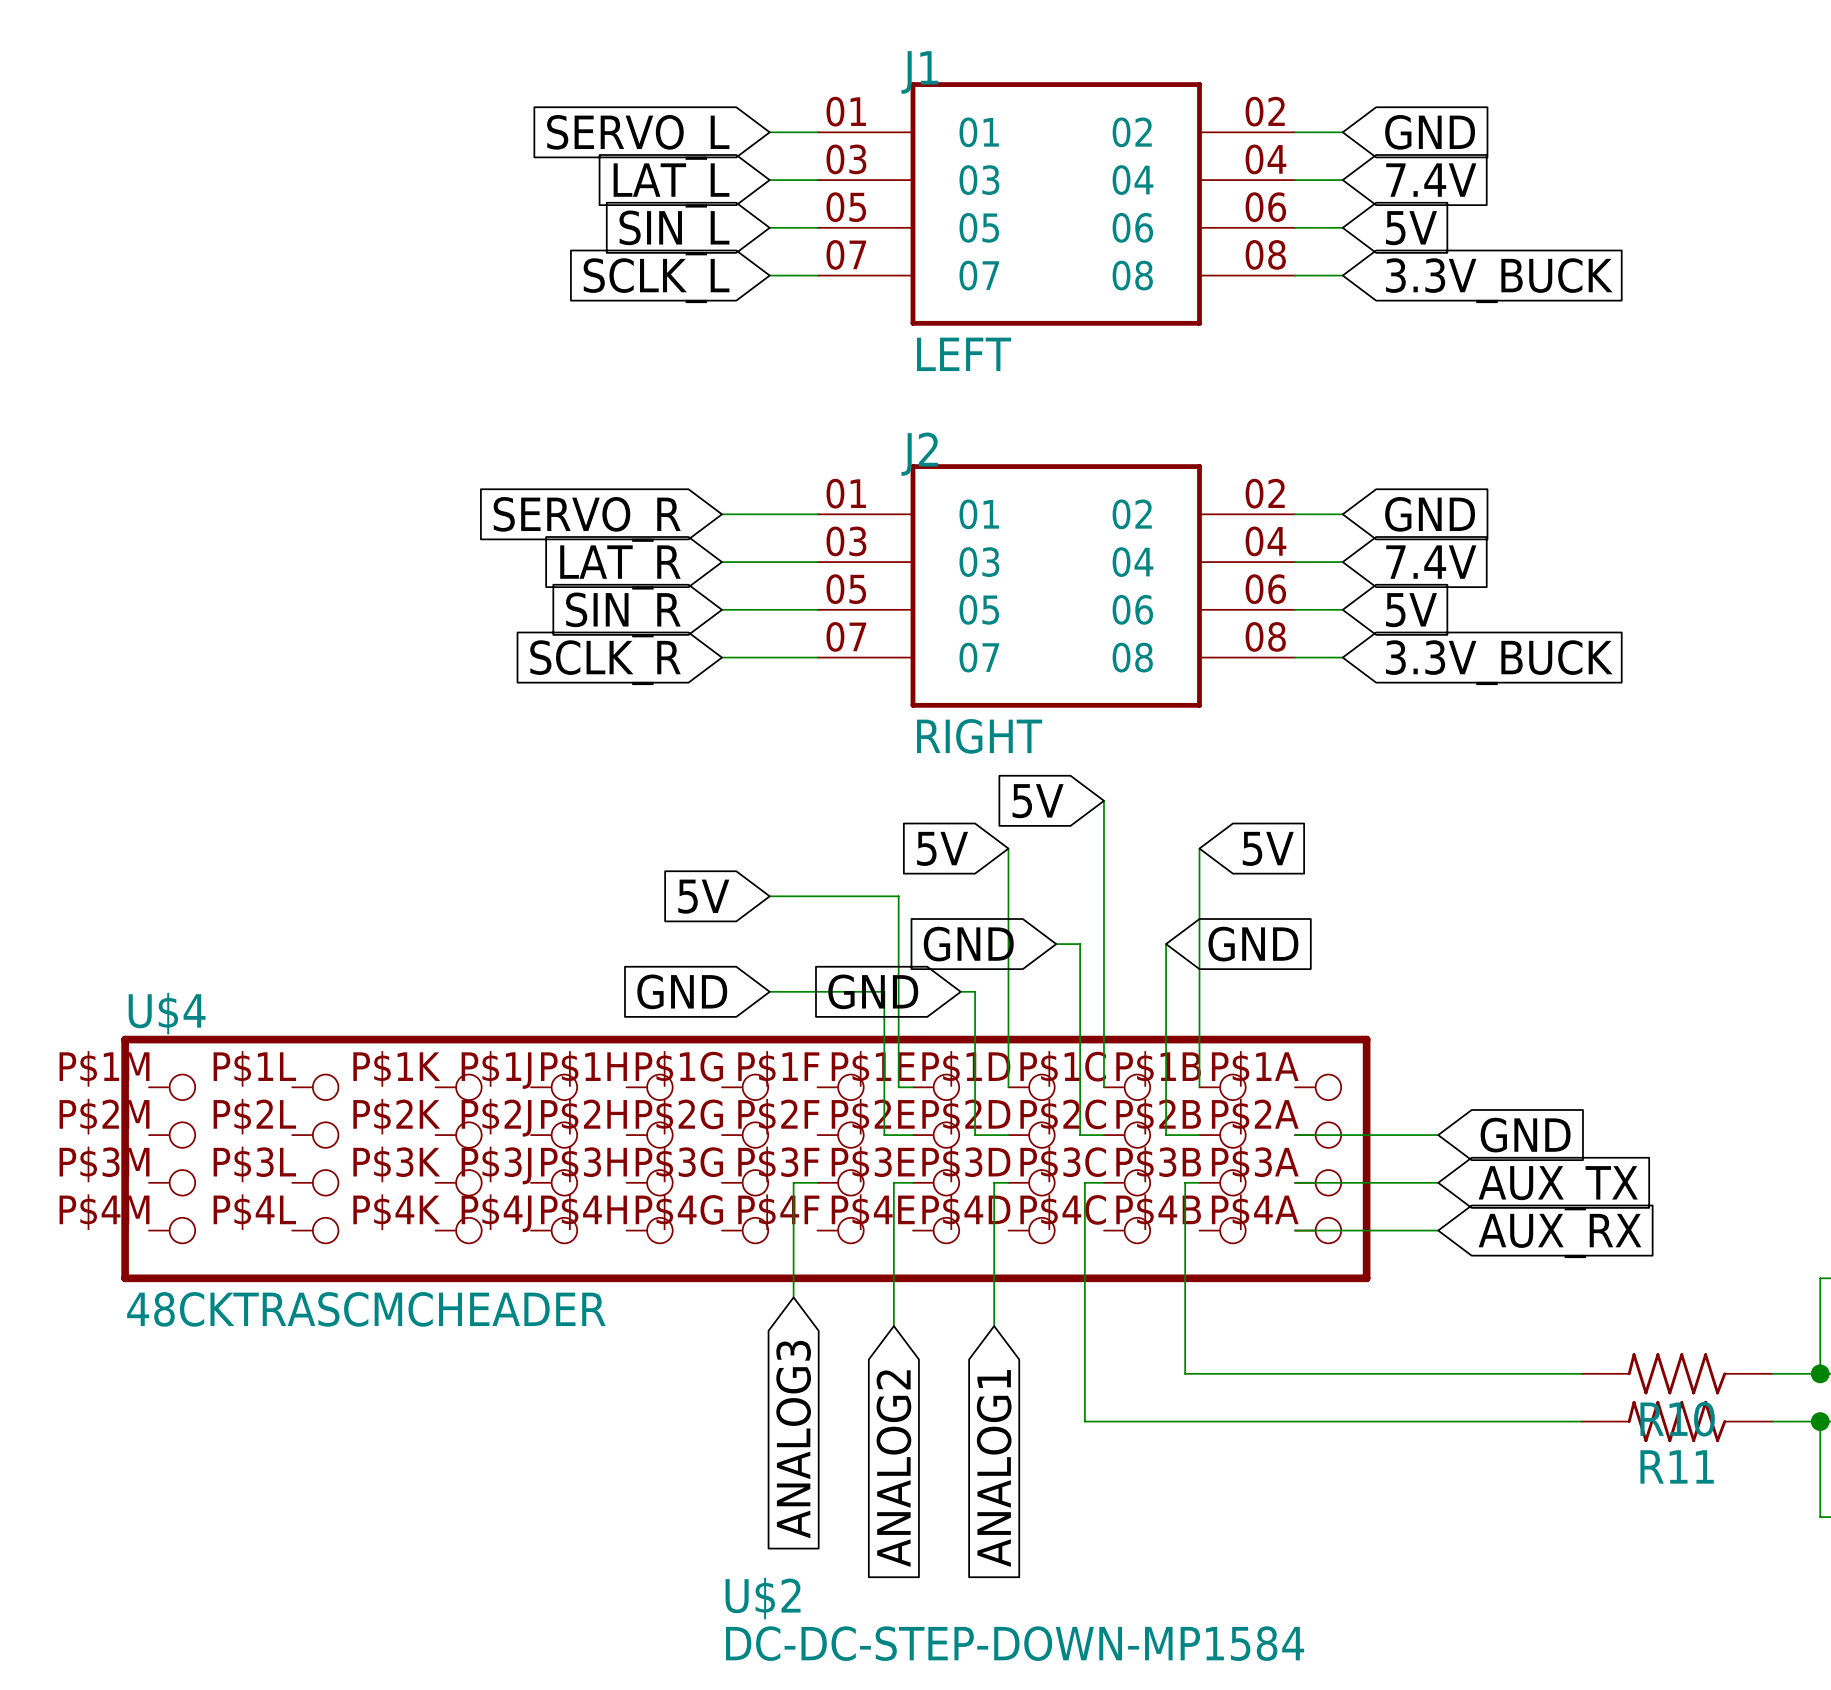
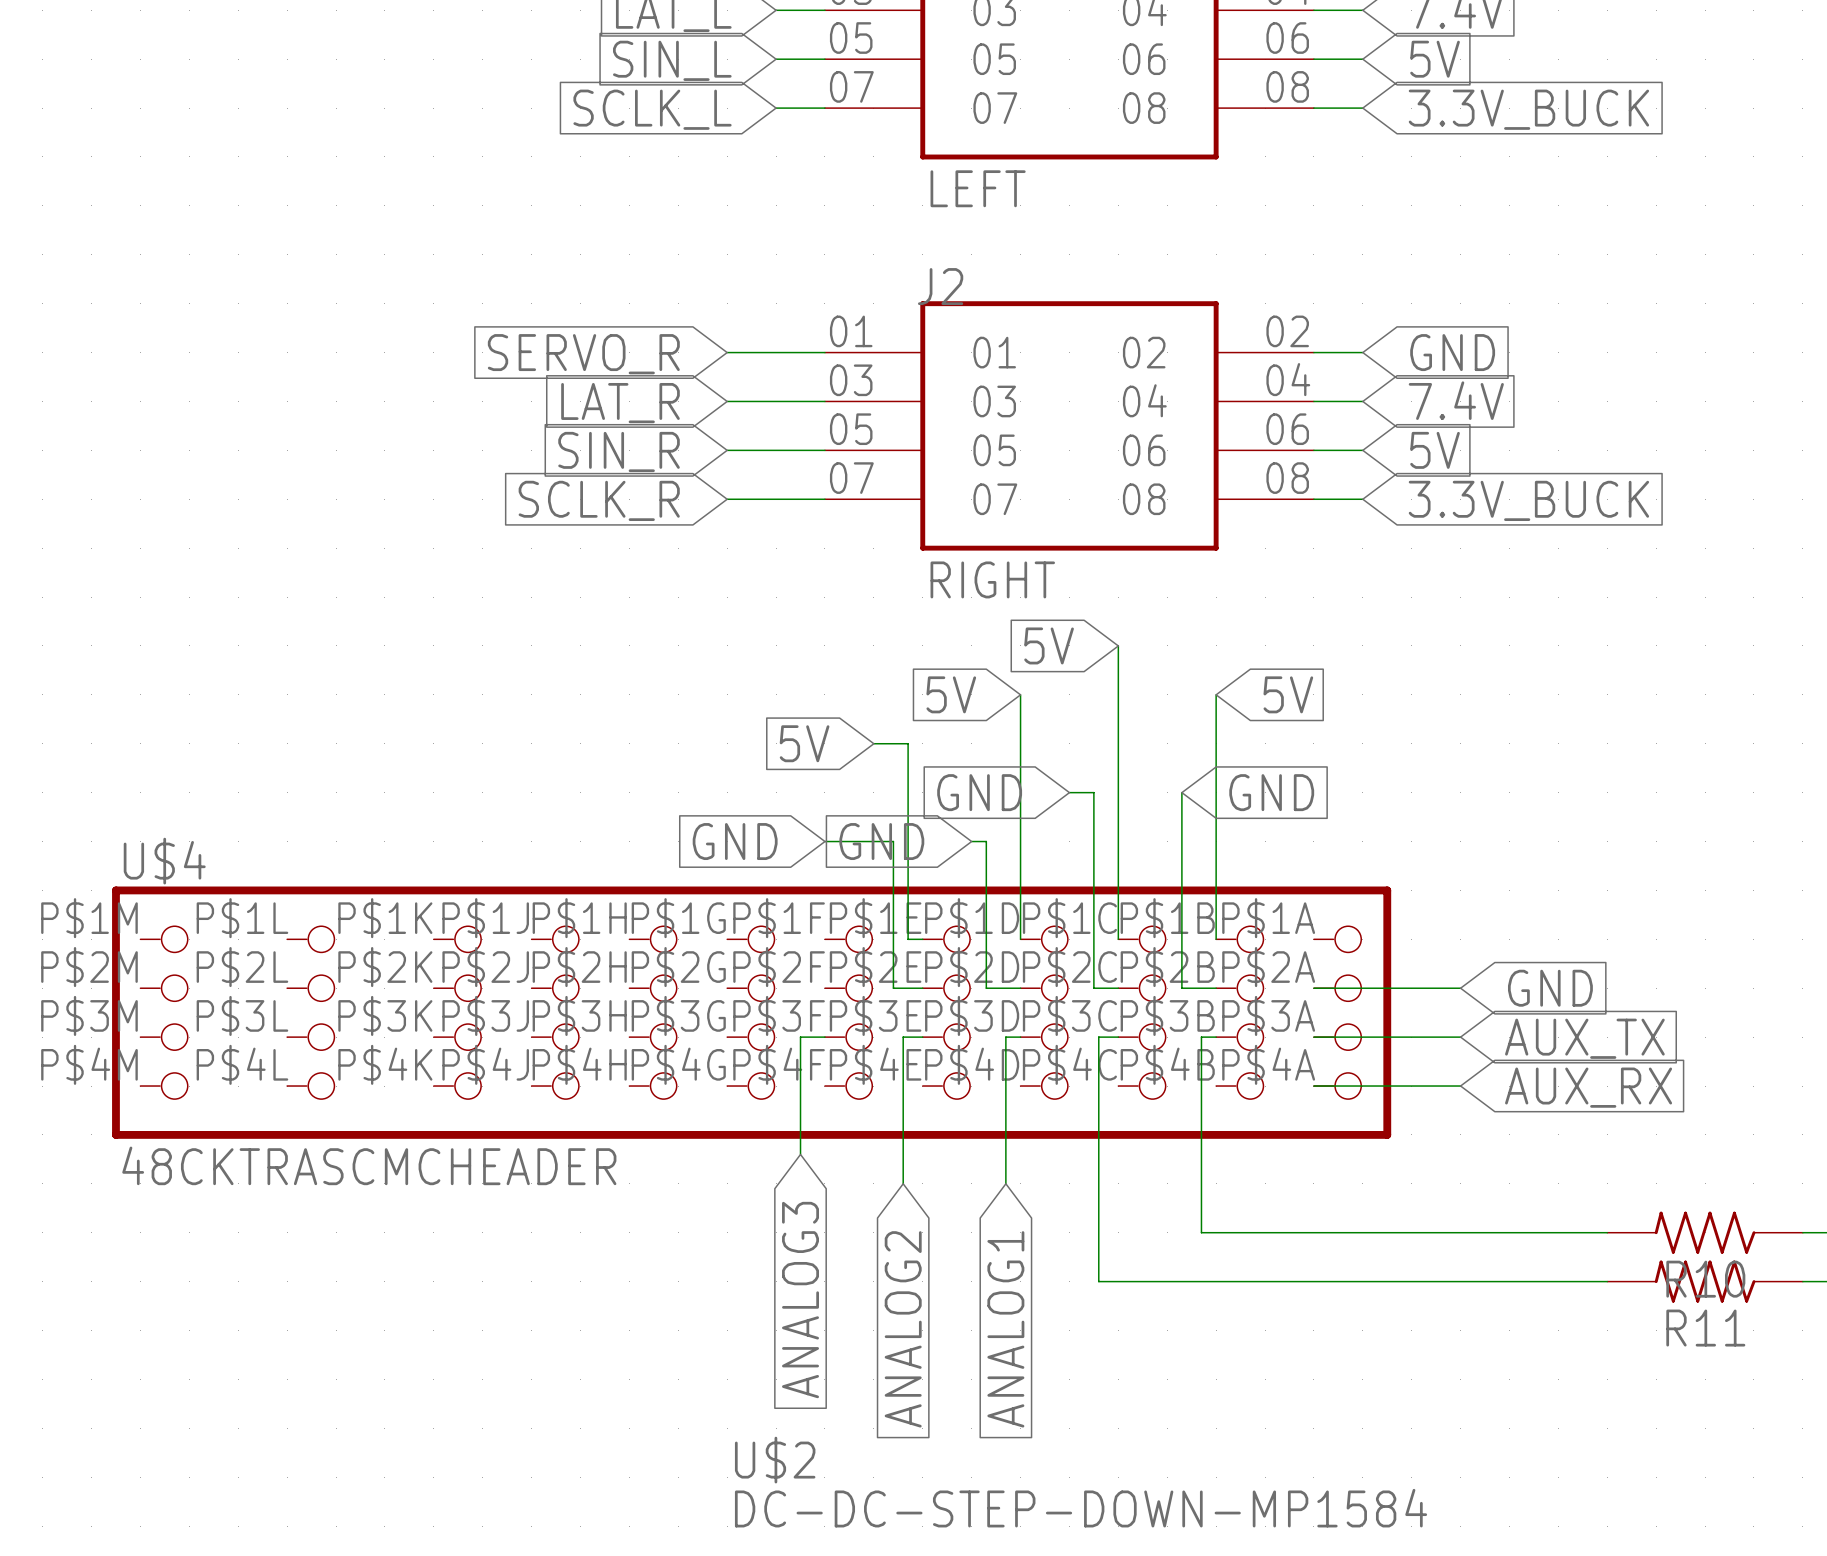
global label position: 5V (703, 896) -> 5V (804, 743)
wire: (769, 896) (865, 896) -> none
global label position: GND (682, 991) -> GND (735, 841)
wire: (769, 991) (817, 991) -> none

